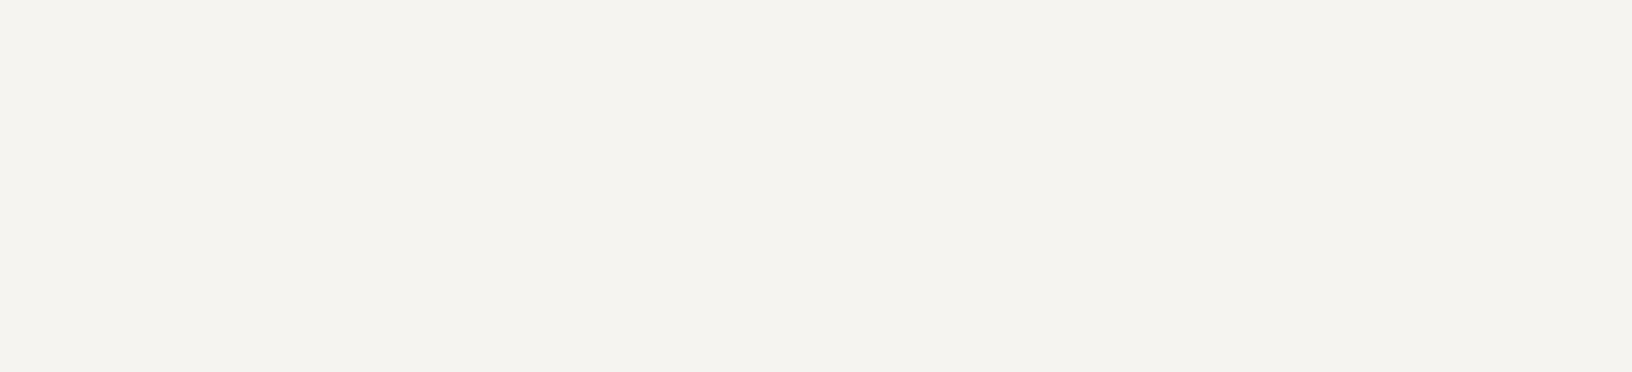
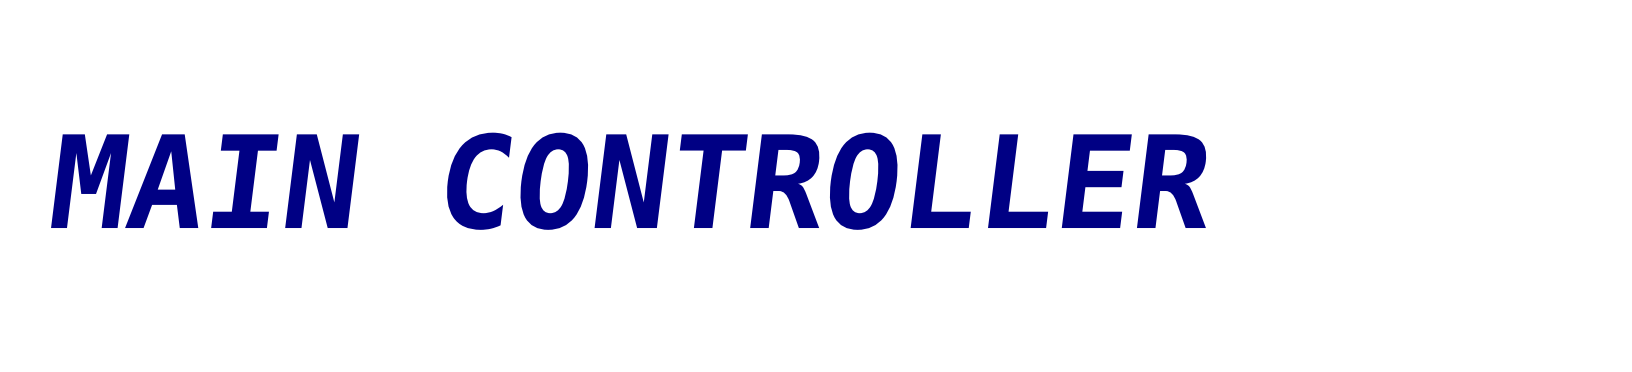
text: none -> MAIN CONTROLLER (629, 181)

